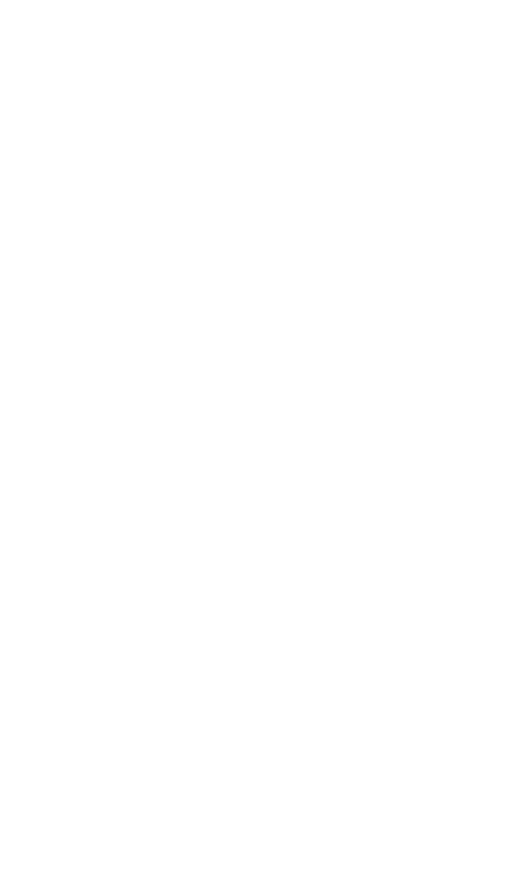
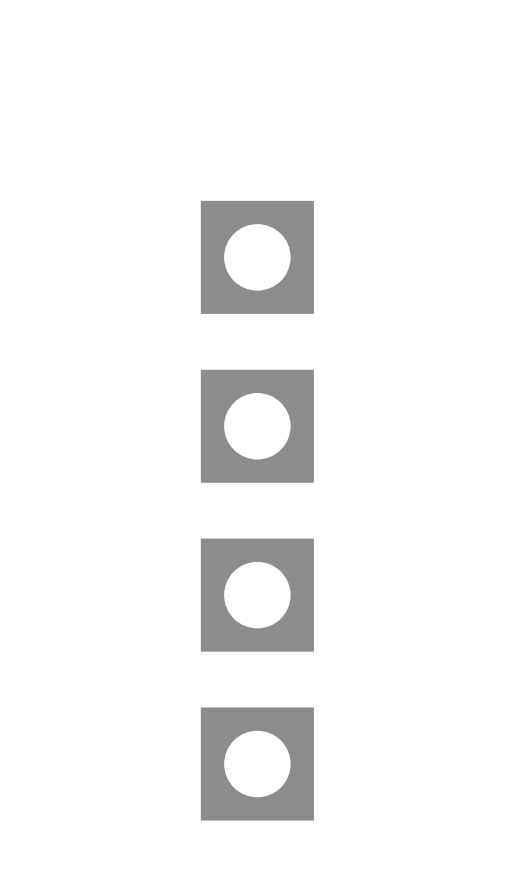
part: none -> (257, 257)
part: none -> (257, 426)
part: none -> (257, 595)
part: none -> (257, 764)

